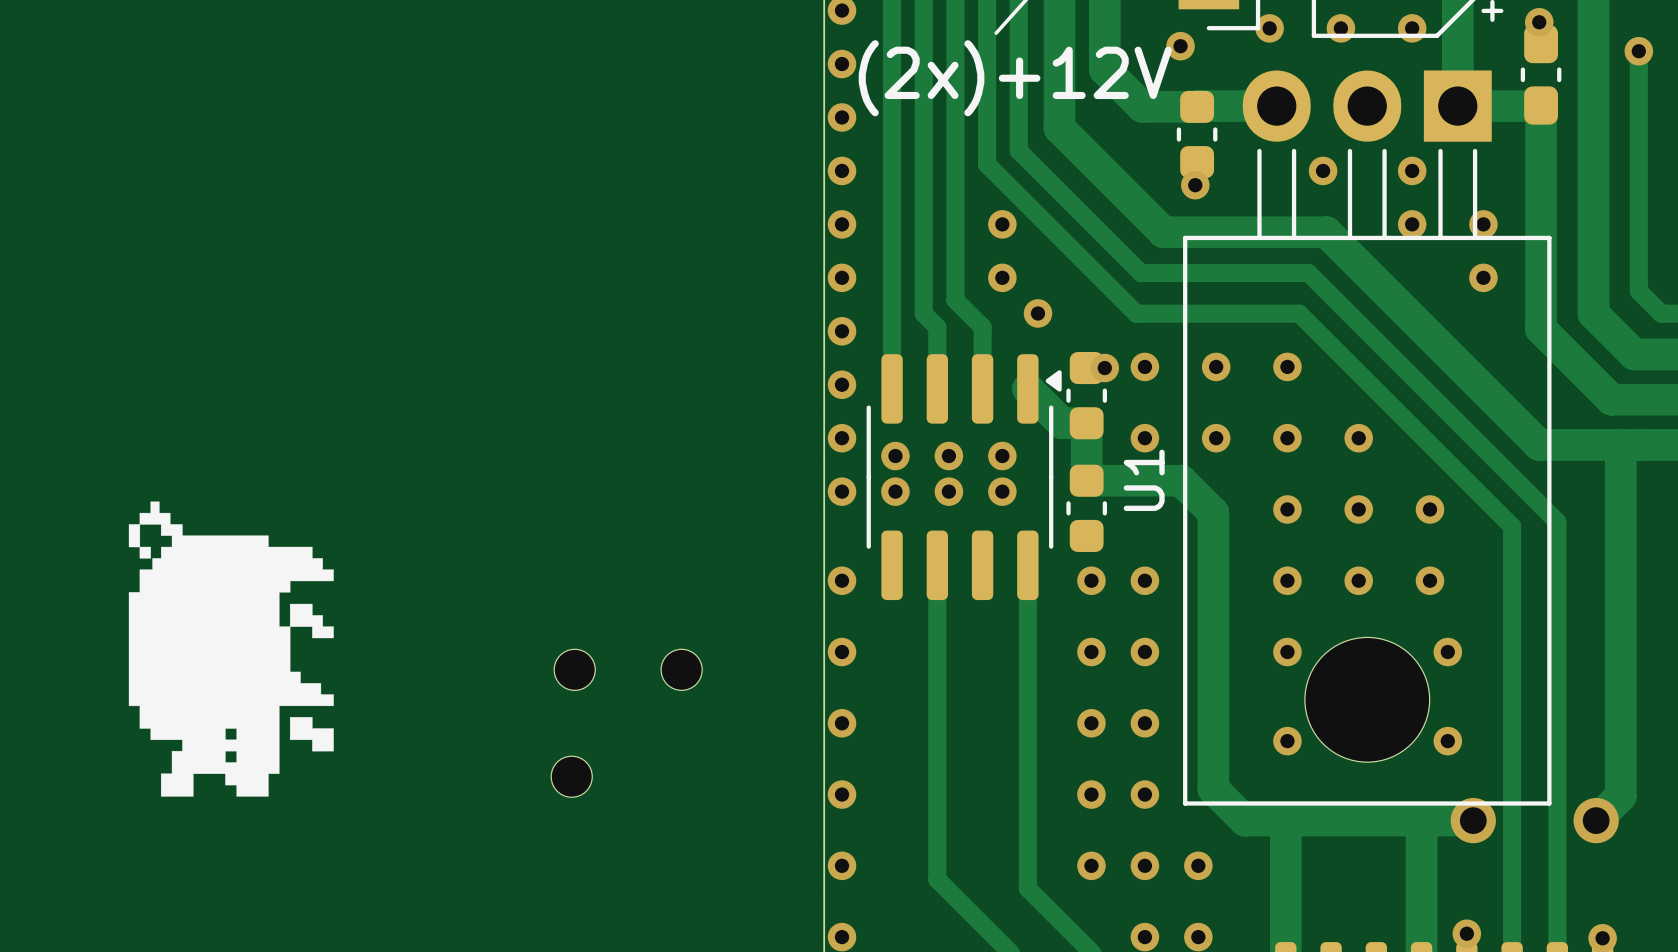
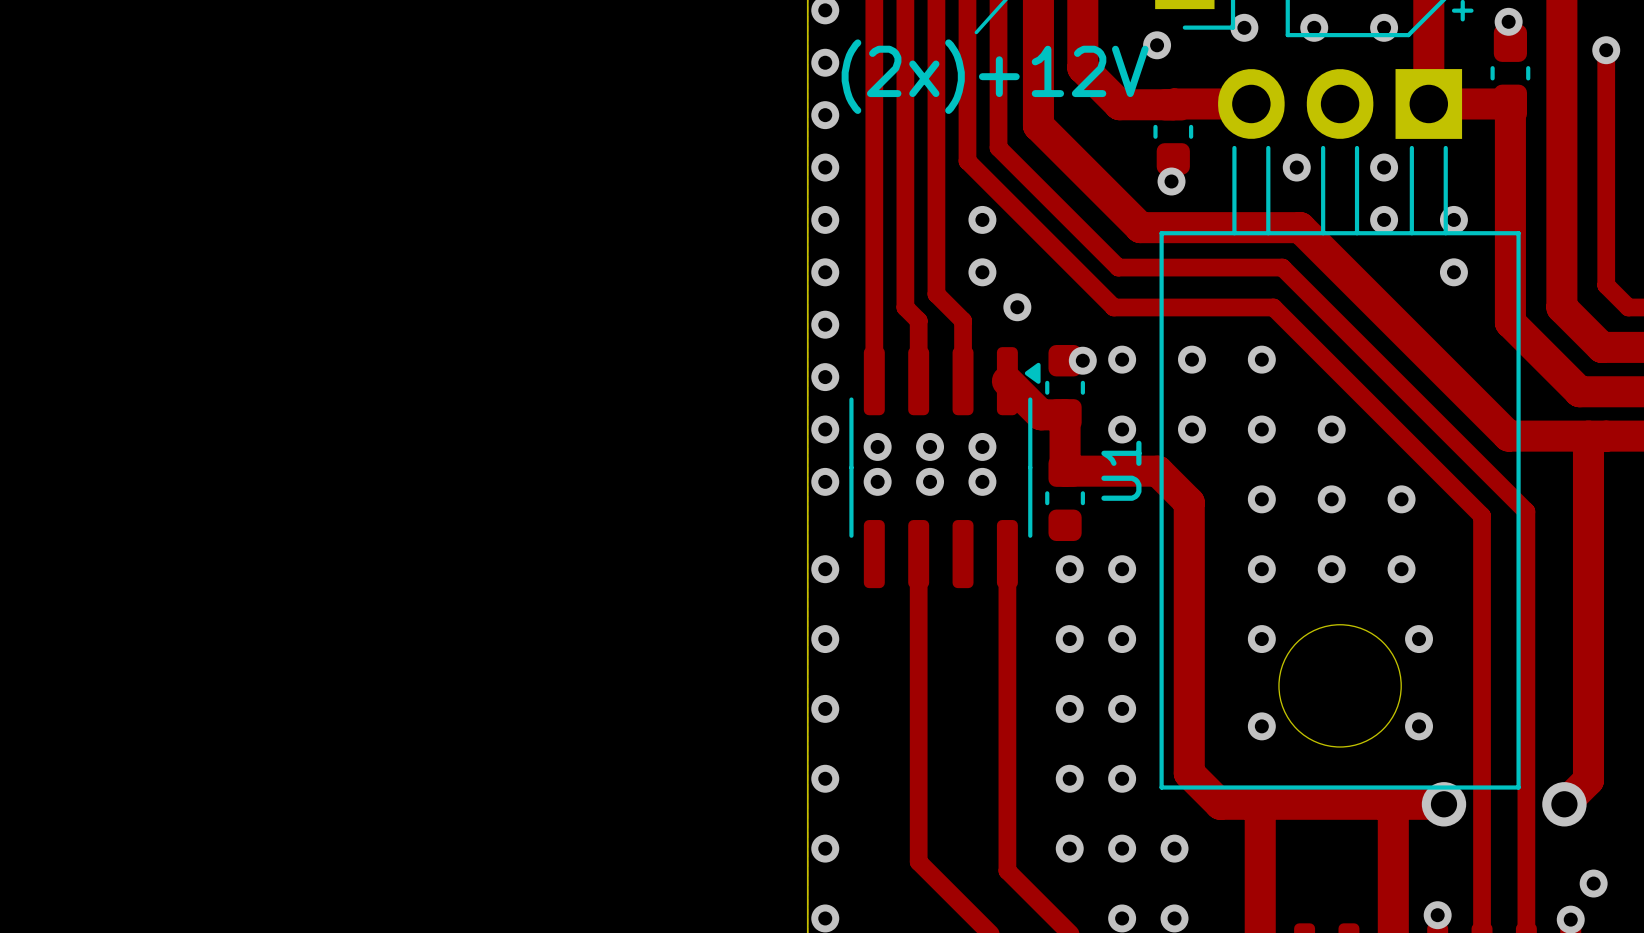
drawing: [128, 501, 334, 797] -> none
part: (574, 669) -> none
part: (681, 669) -> none
part: (571, 776) -> none
via: none -> (1593, 883)

